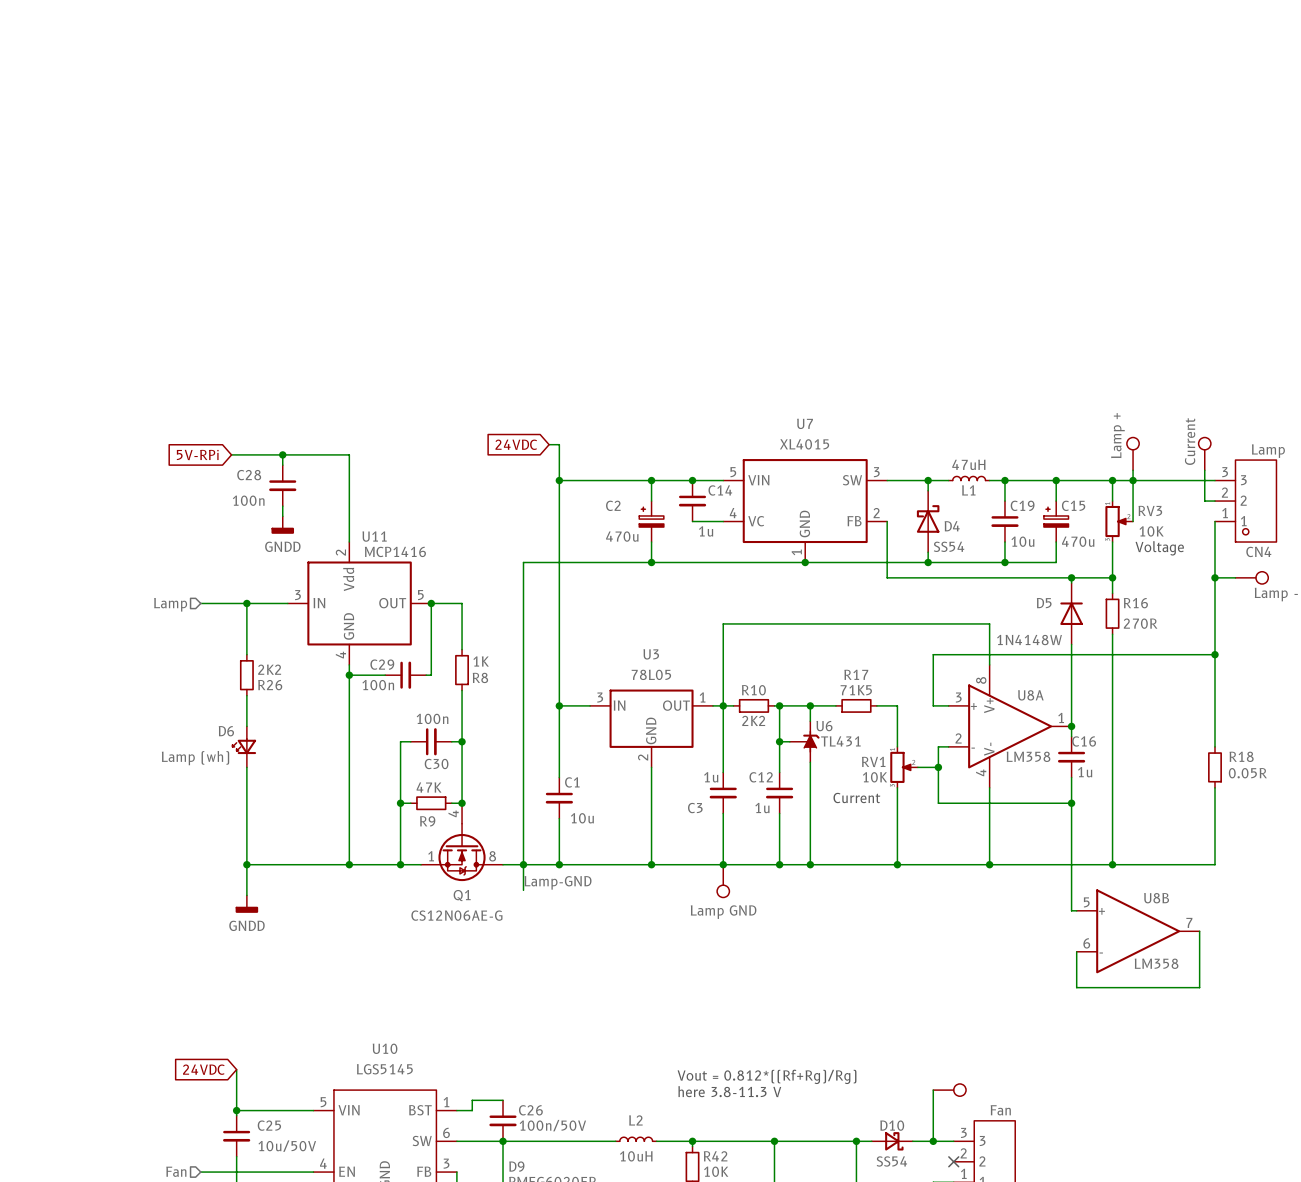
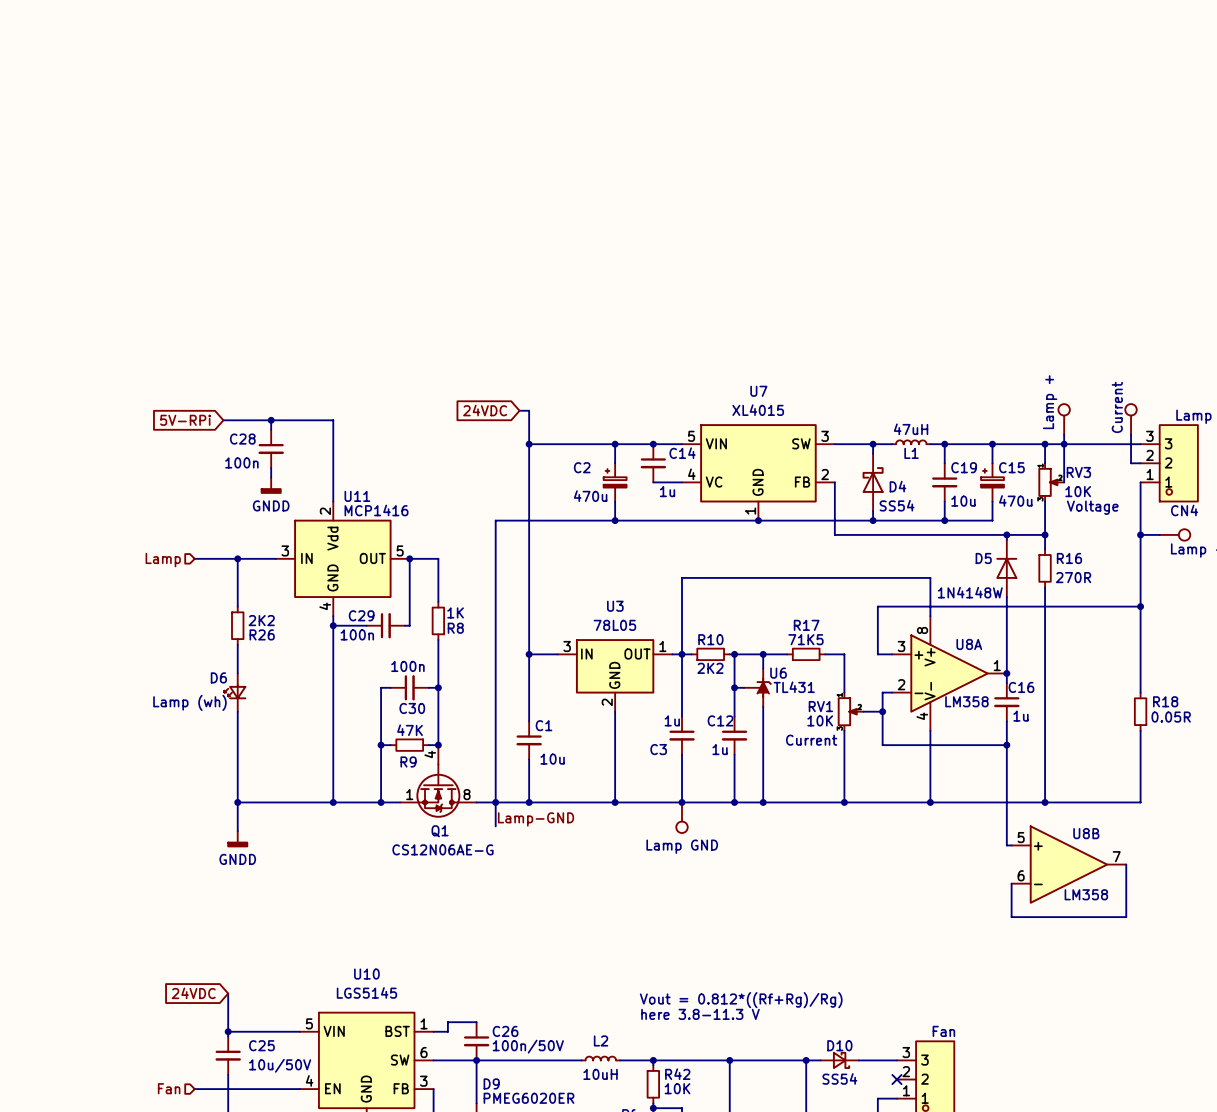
wire: (933, 1090) (933, 1141) -> none
part: (949, 1090) -> none
junction: (933, 1141) -> none

